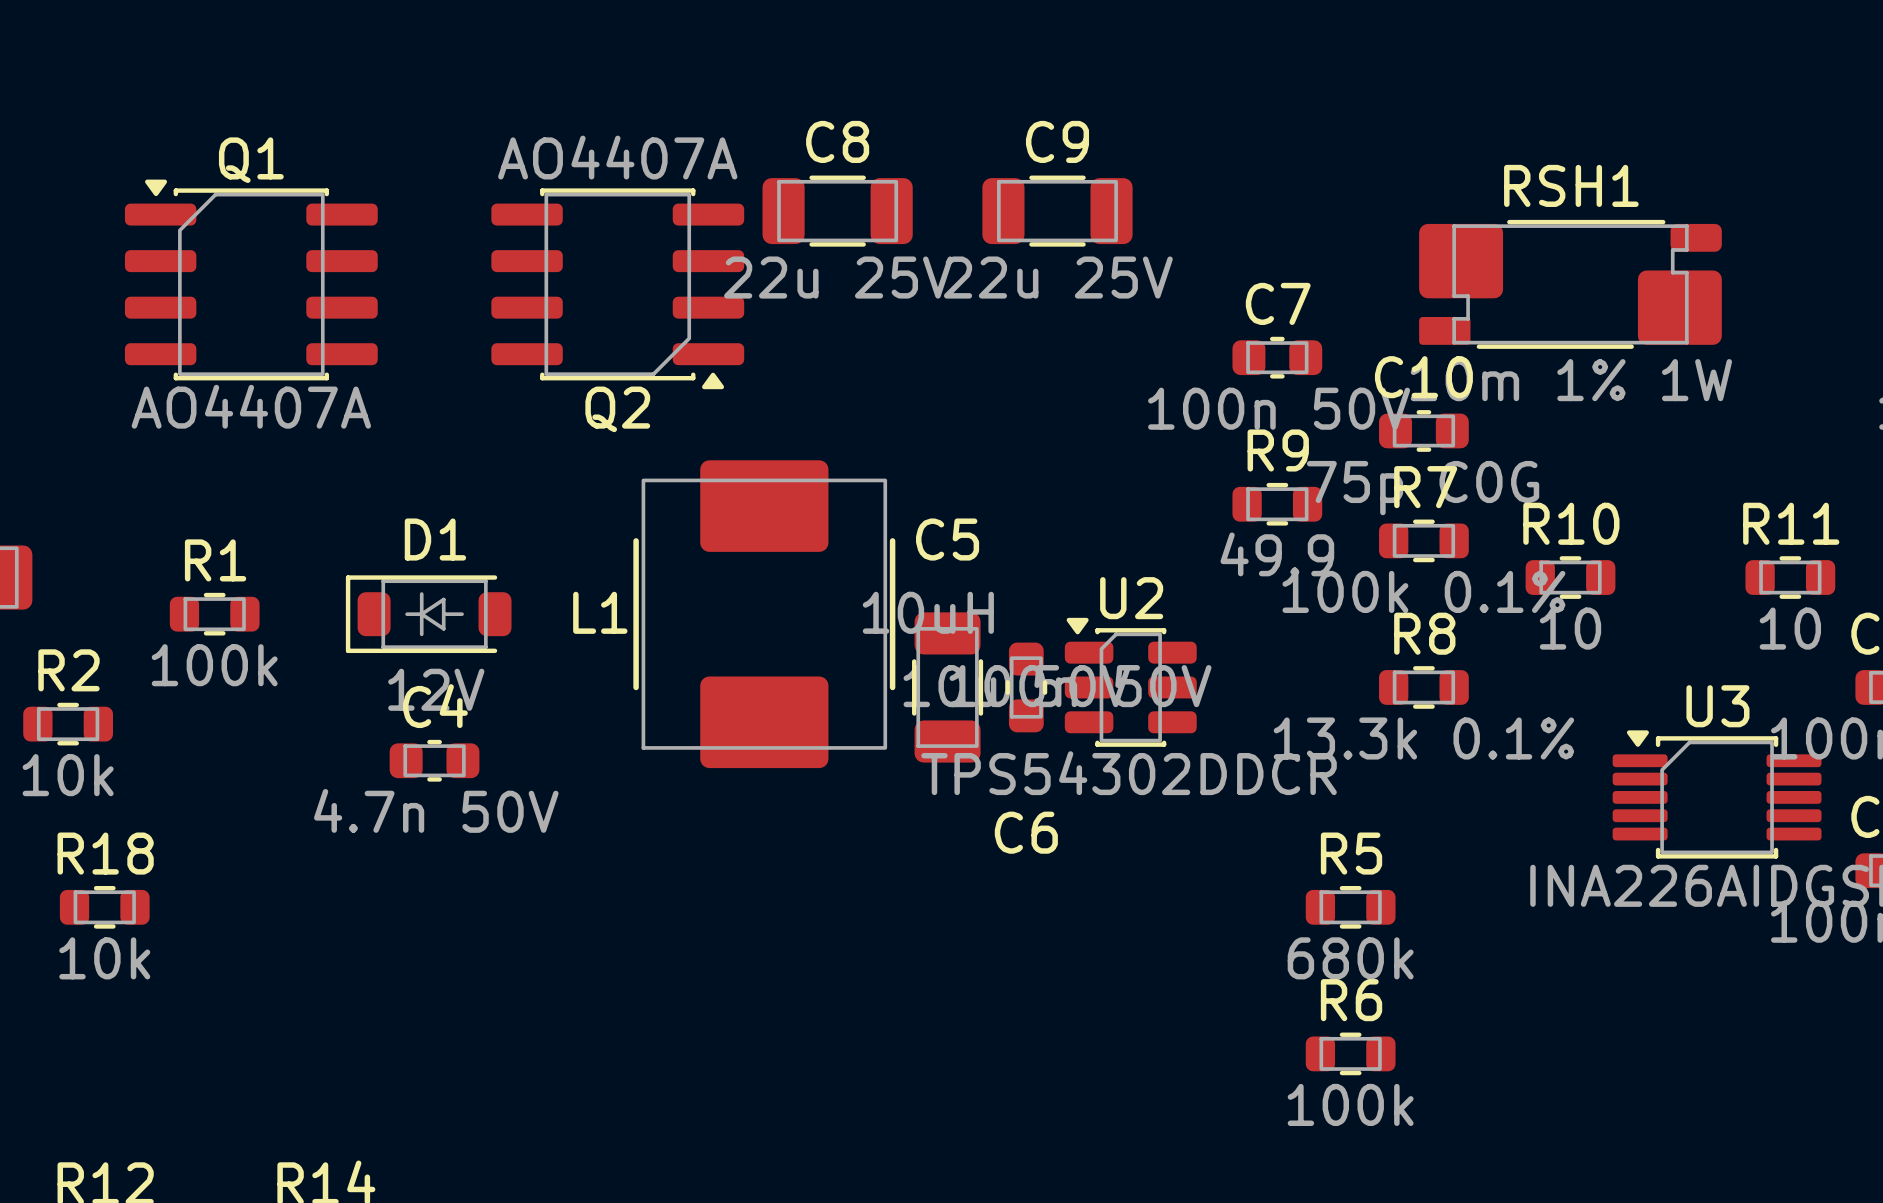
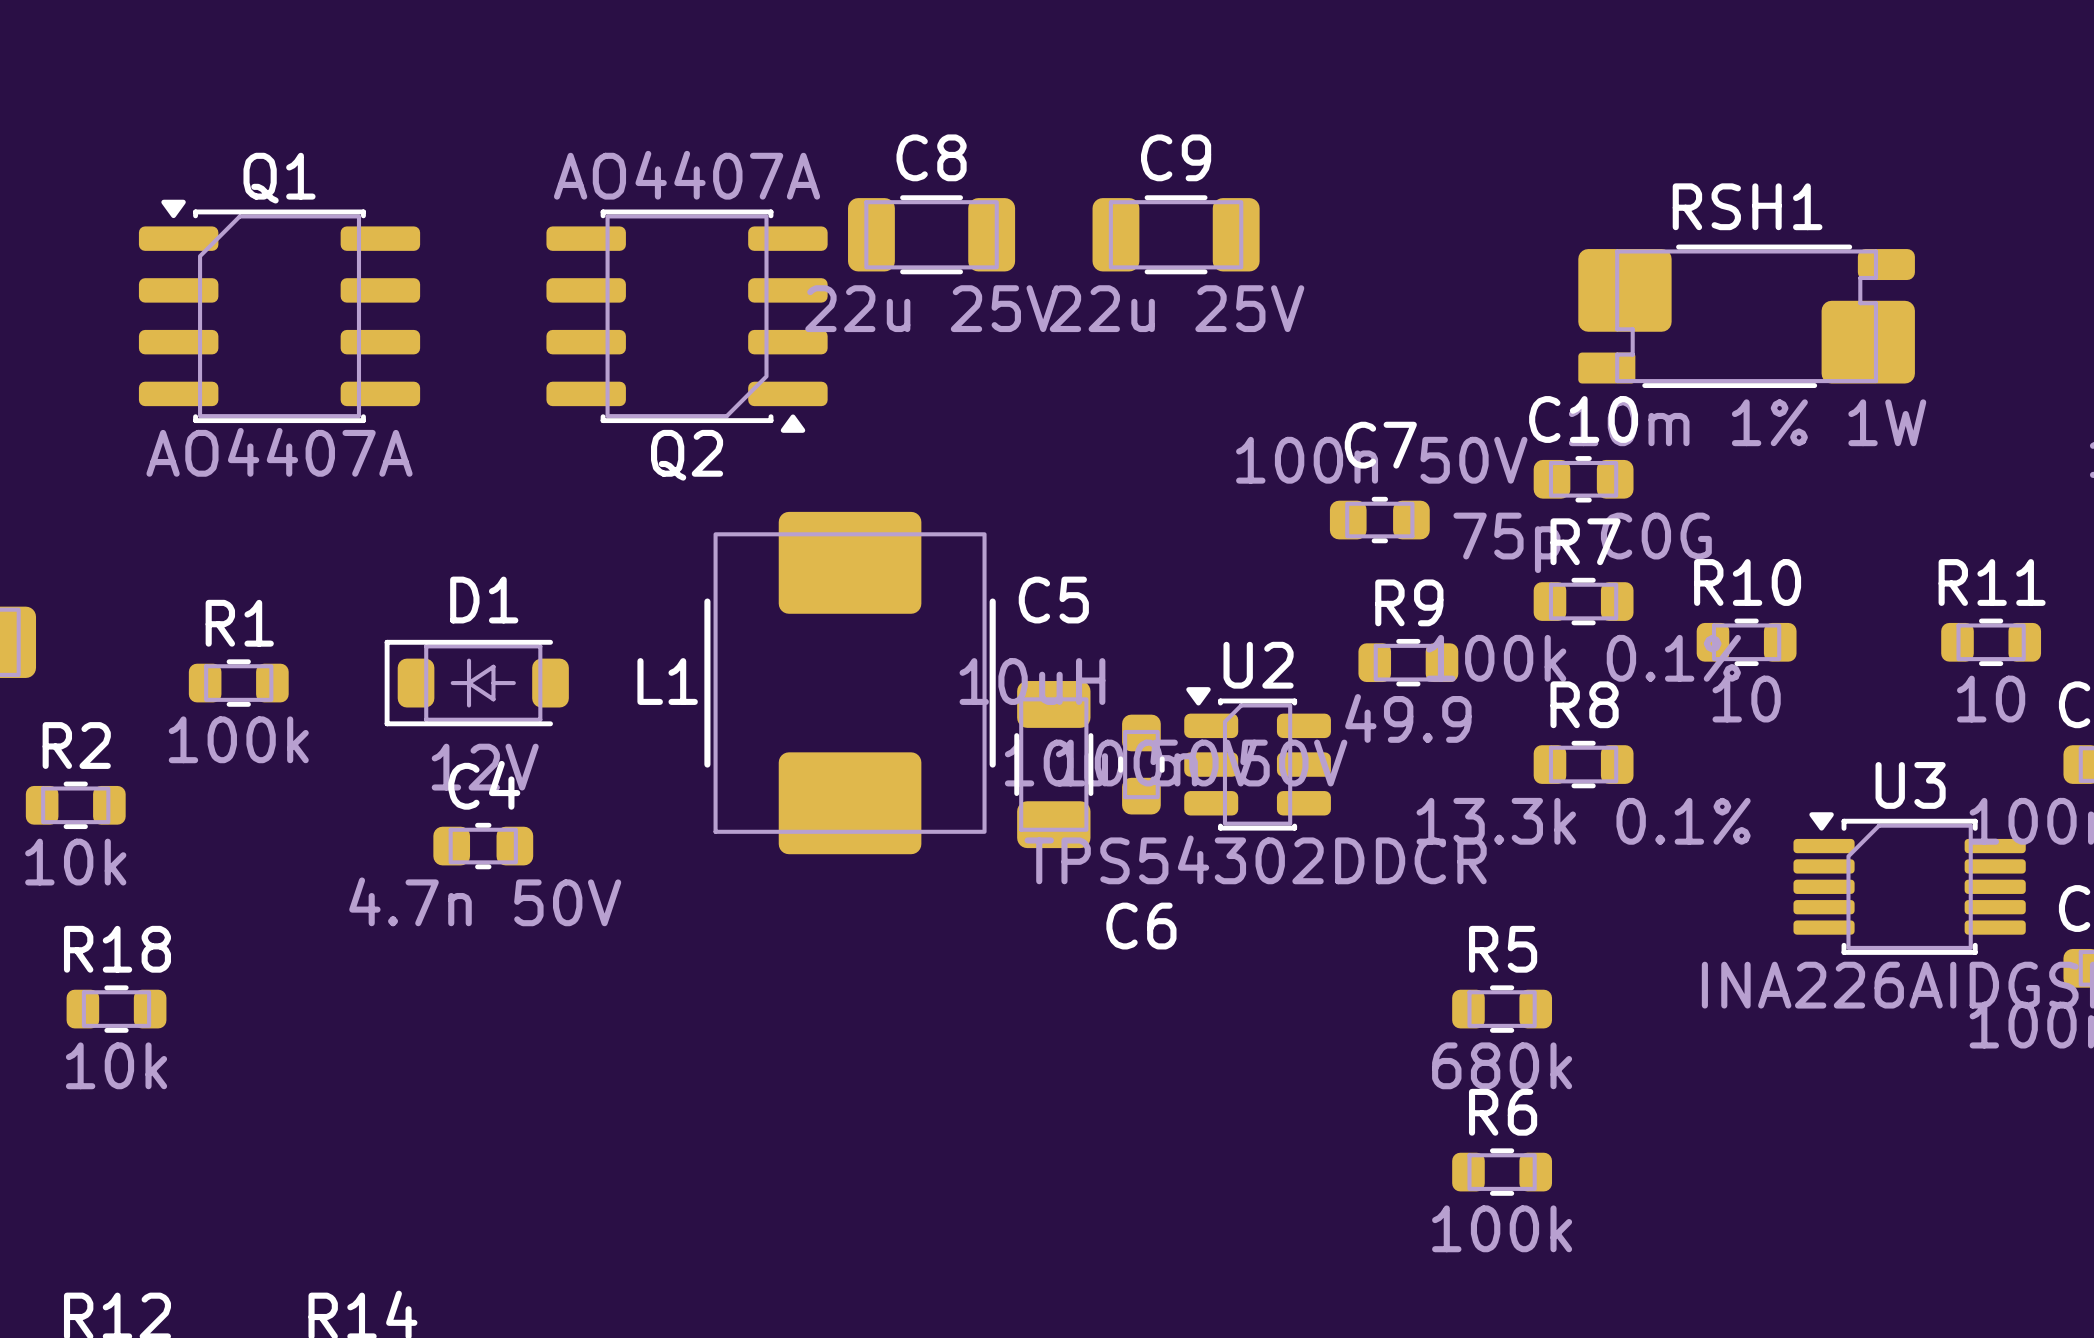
C7 name position: C7 (1278, 303) -> C7 (1380, 445)
C7 position: (1277, 357) -> (1379, 520)
C7 value position: 100n 50V (1279, 408) -> 100n 50V (1381, 460)
R9 position: (1277, 504) -> (1408, 662)

